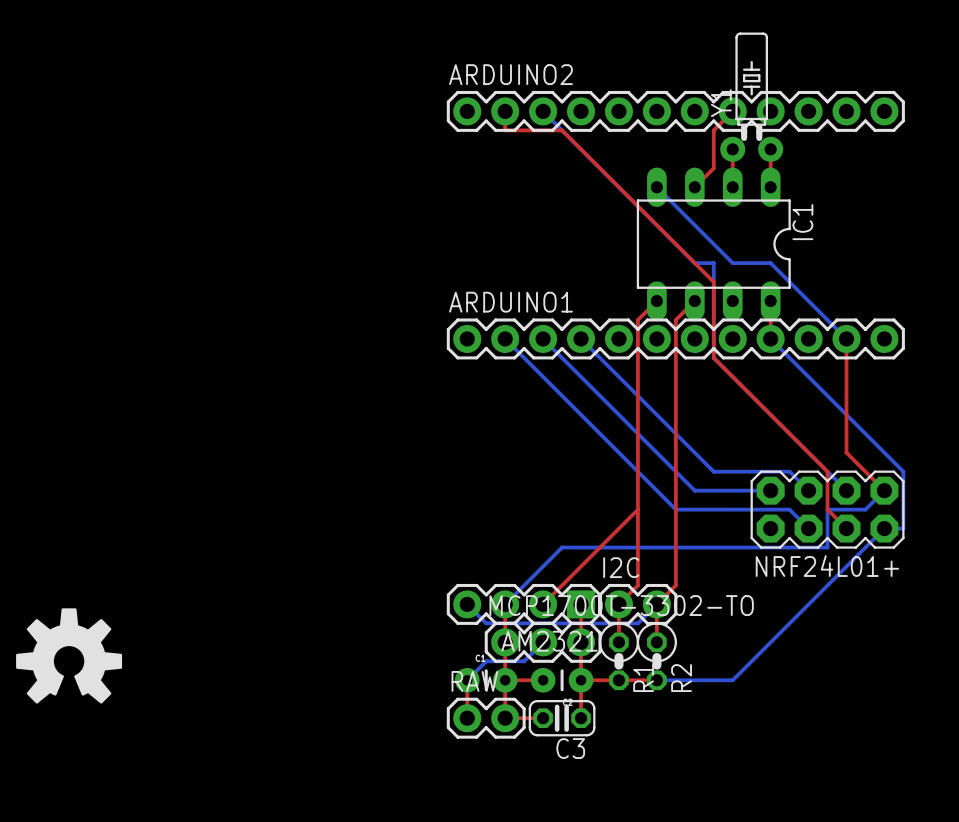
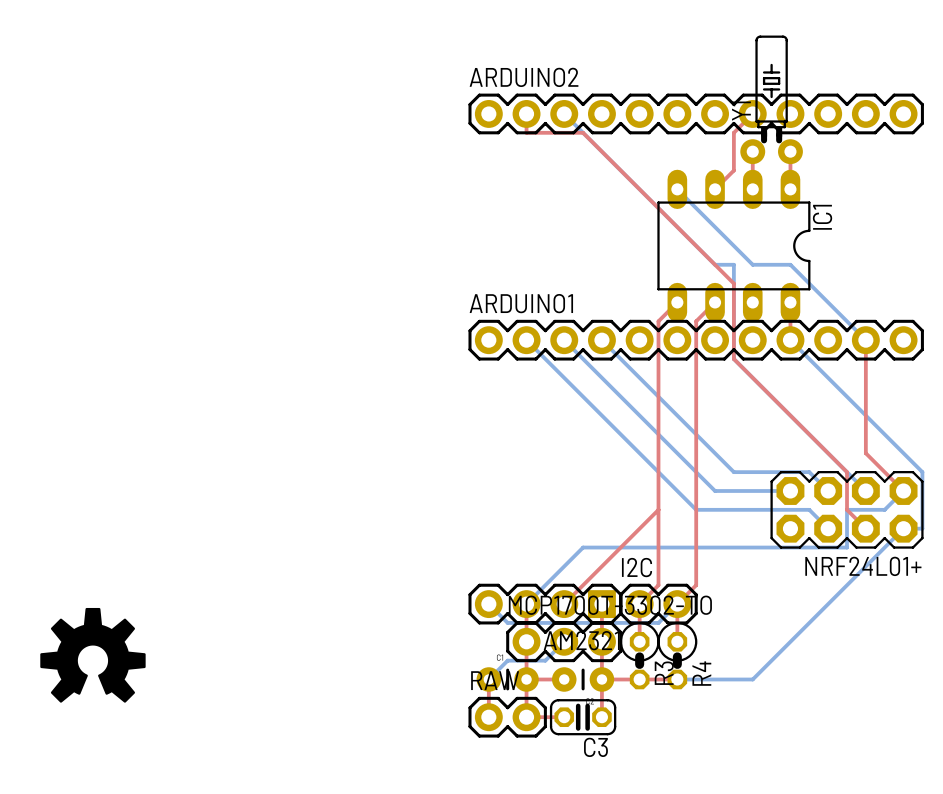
R1 name: R1 (643, 678) -> R3 (664, 673)
R2 name: R2 (681, 678) -> R4 (701, 673)

